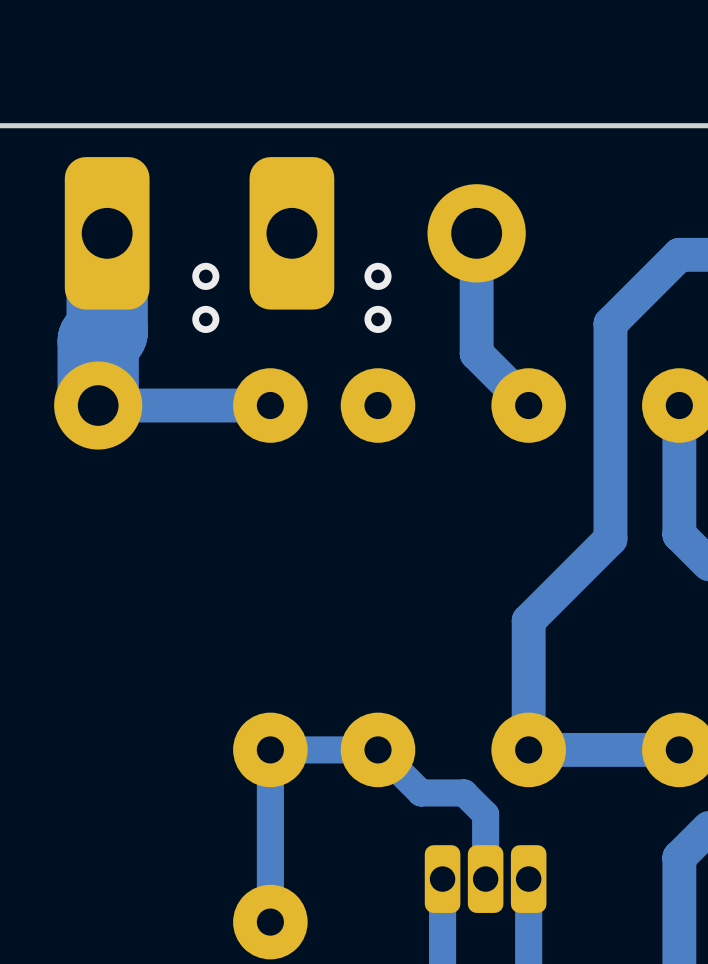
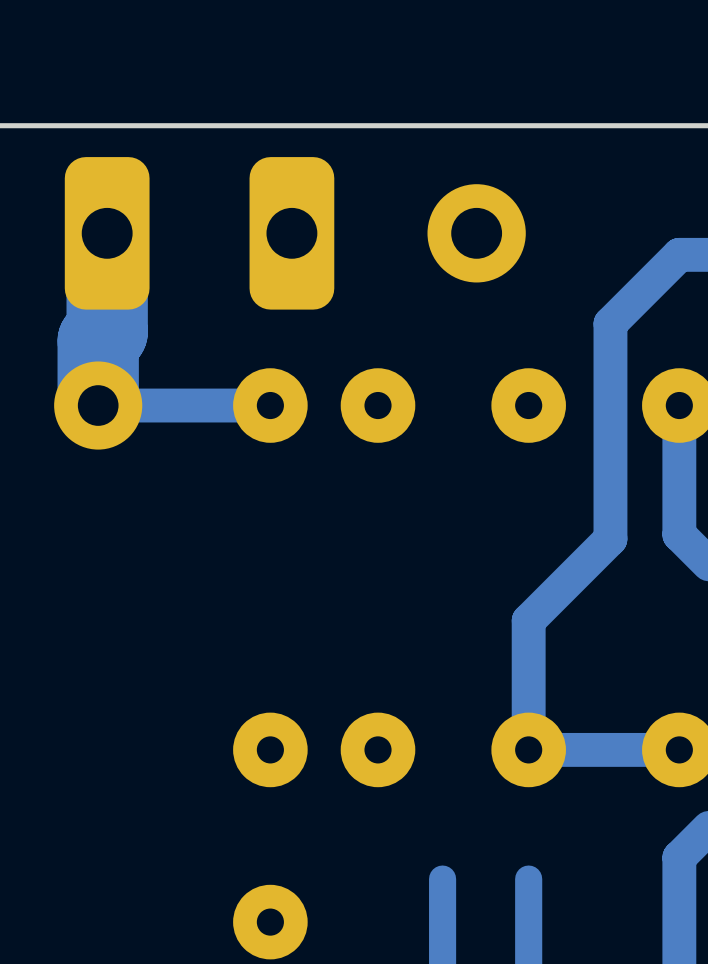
bottom track: (476, 233) (476, 353) (528, 405) -> none
via: (205, 276) -> none
via: (378, 276) -> none
via: (205, 319) -> none
via: (378, 319) -> none
bottom track: (485, 879) (485, 814) (464, 792) (421, 792) (378, 749) (270, 749) (270, 922) -> none
part: (485, 879) -> none

